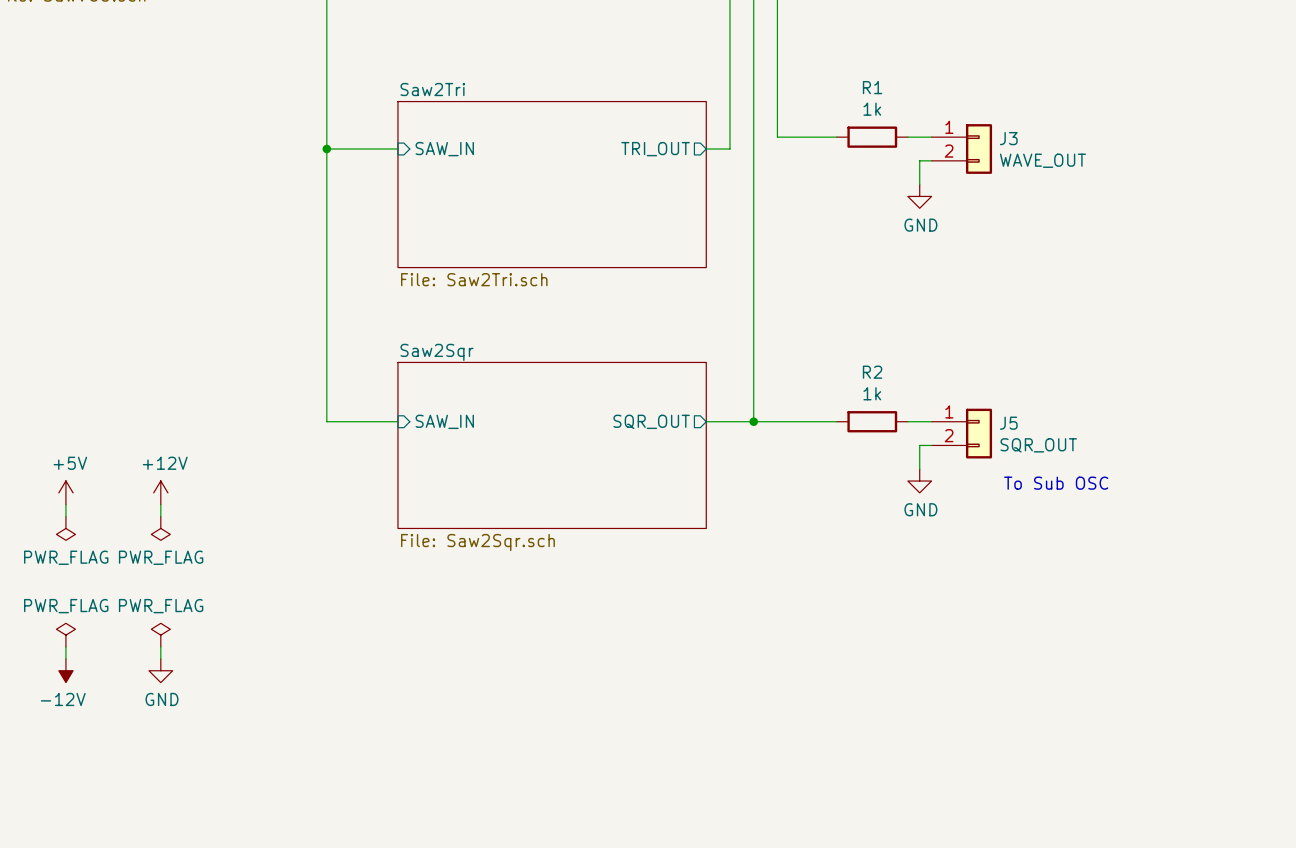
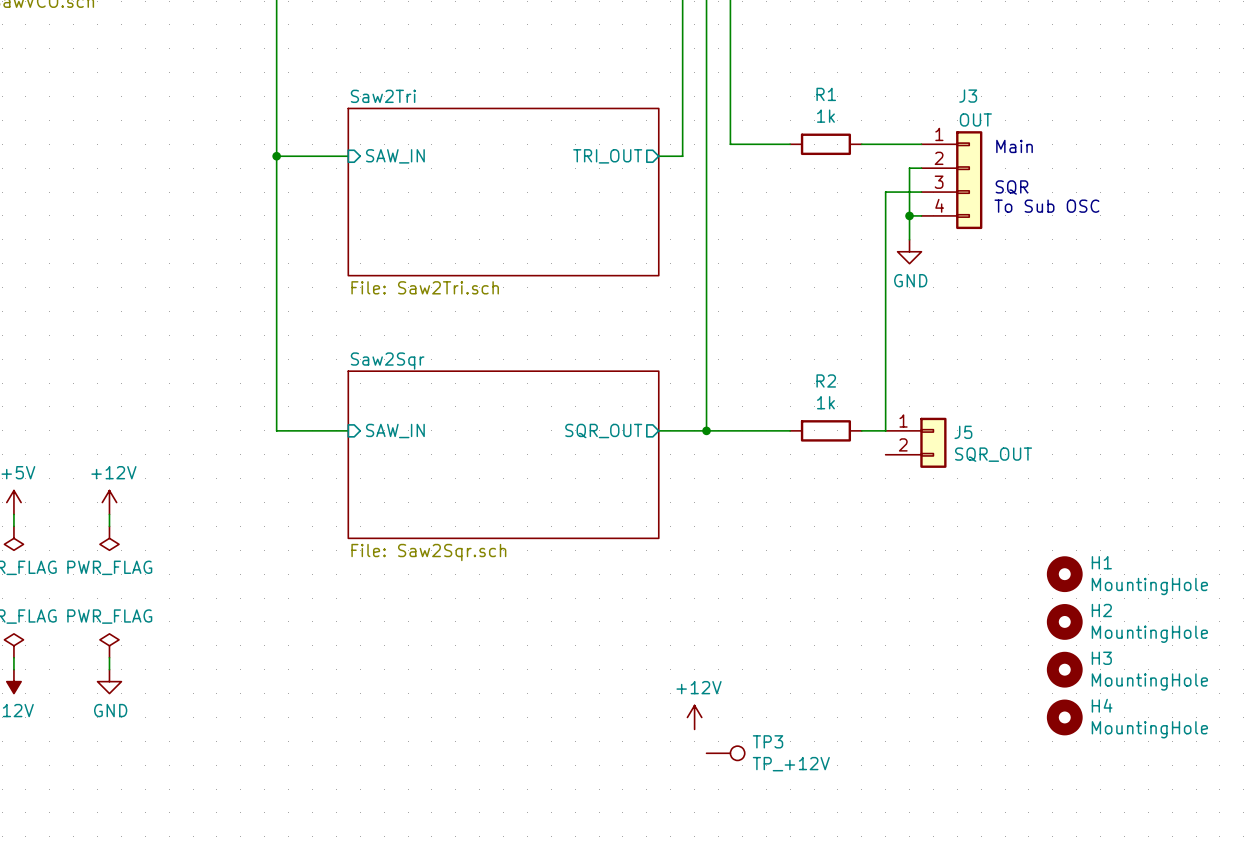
J3 symbol: [931, 124, 993, 174] -> [921, 131, 983, 230]
J3 name position: J3 (1008, 138) -> J3 (968, 96)
text: none -> Main (1014, 146)
wire: (931, 160) (919, 160) (919, 184) -> none
wire: none -> (921, 168) (909, 168) (909, 239)
J3 value: WAVE_OUT (1042, 160) -> OUT (975, 119)
text: none -> SQR (1011, 187)
wire: none -> (921, 192) (885, 192) (885, 430)
power symbol position: GND (919, 196) -> GND (909, 251)
text: none -> To Sub OSC (1046, 206)
wire: none -> (909, 215) (921, 215)
junction: none -> (909, 215)
wire: (931, 445) (919, 445) (919, 469) -> none
power symbol: GND (919, 481) -> none
text: To Sub OSC (1056, 483) -> none
H1: none -> MountingHole (1064, 574)
H2: none -> MountingHole (1064, 621)
H3: none -> MountingHole (1064, 669)
power symbol: none -> +12V (694, 717)
H4: none -> MountingHole (1064, 717)
TP3: none -> TP_+12V (725, 753)

